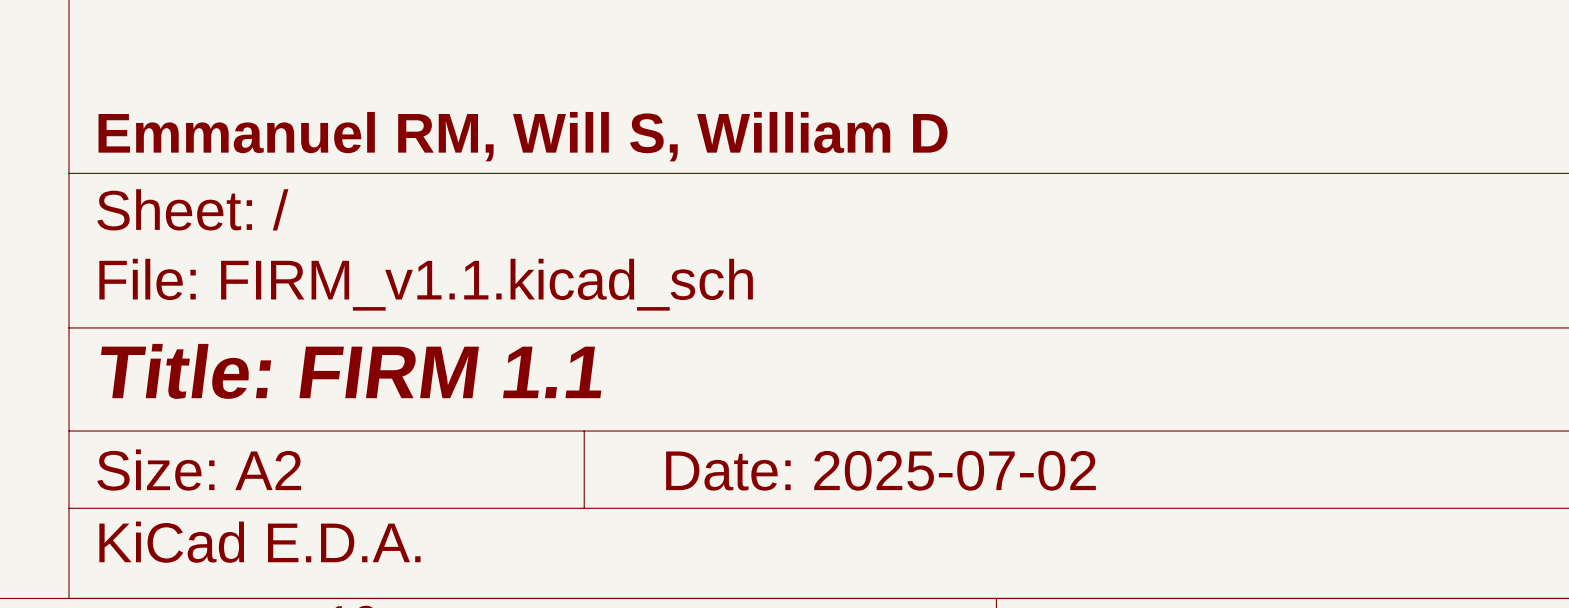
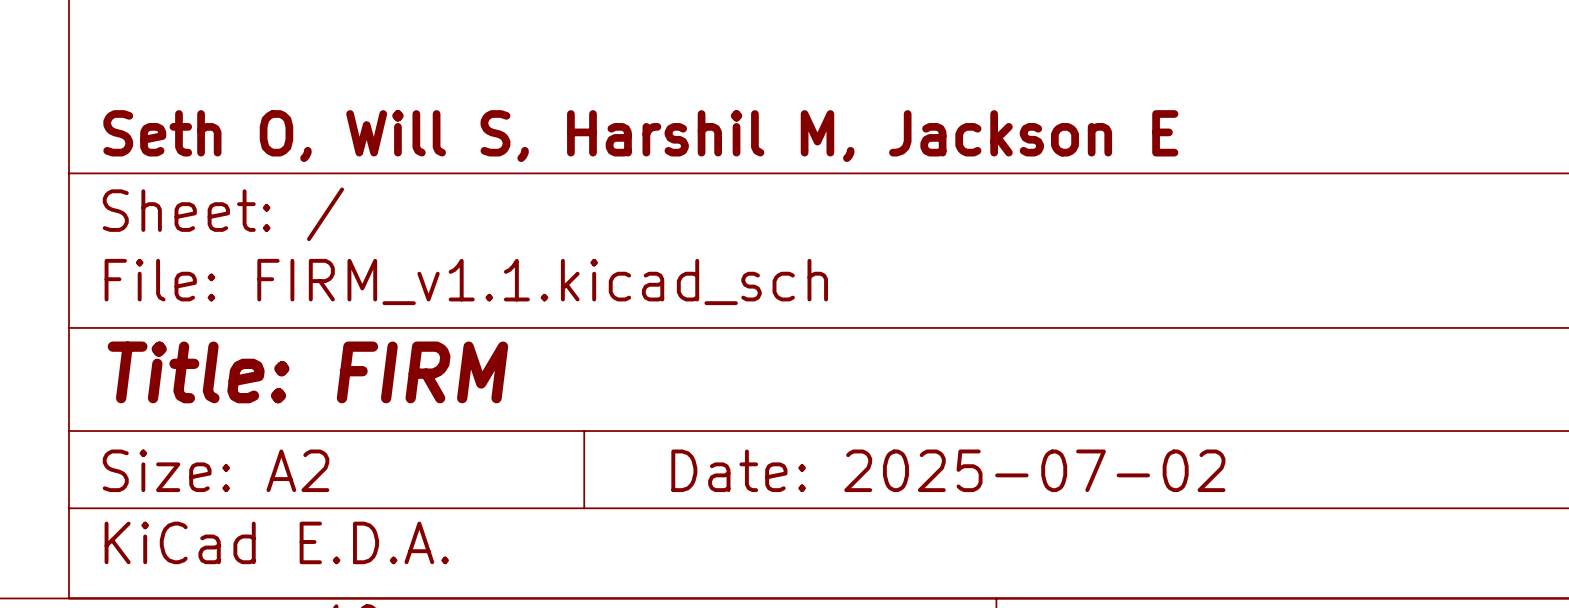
title block: Emmanuel RM, Will S, William D (523, 136) -> Seth O, Will S, Harshil M, Jackson E (640, 136)
title block: Title: FIRM 1.1 (351, 371) -> Title: FIRM (307, 372)

